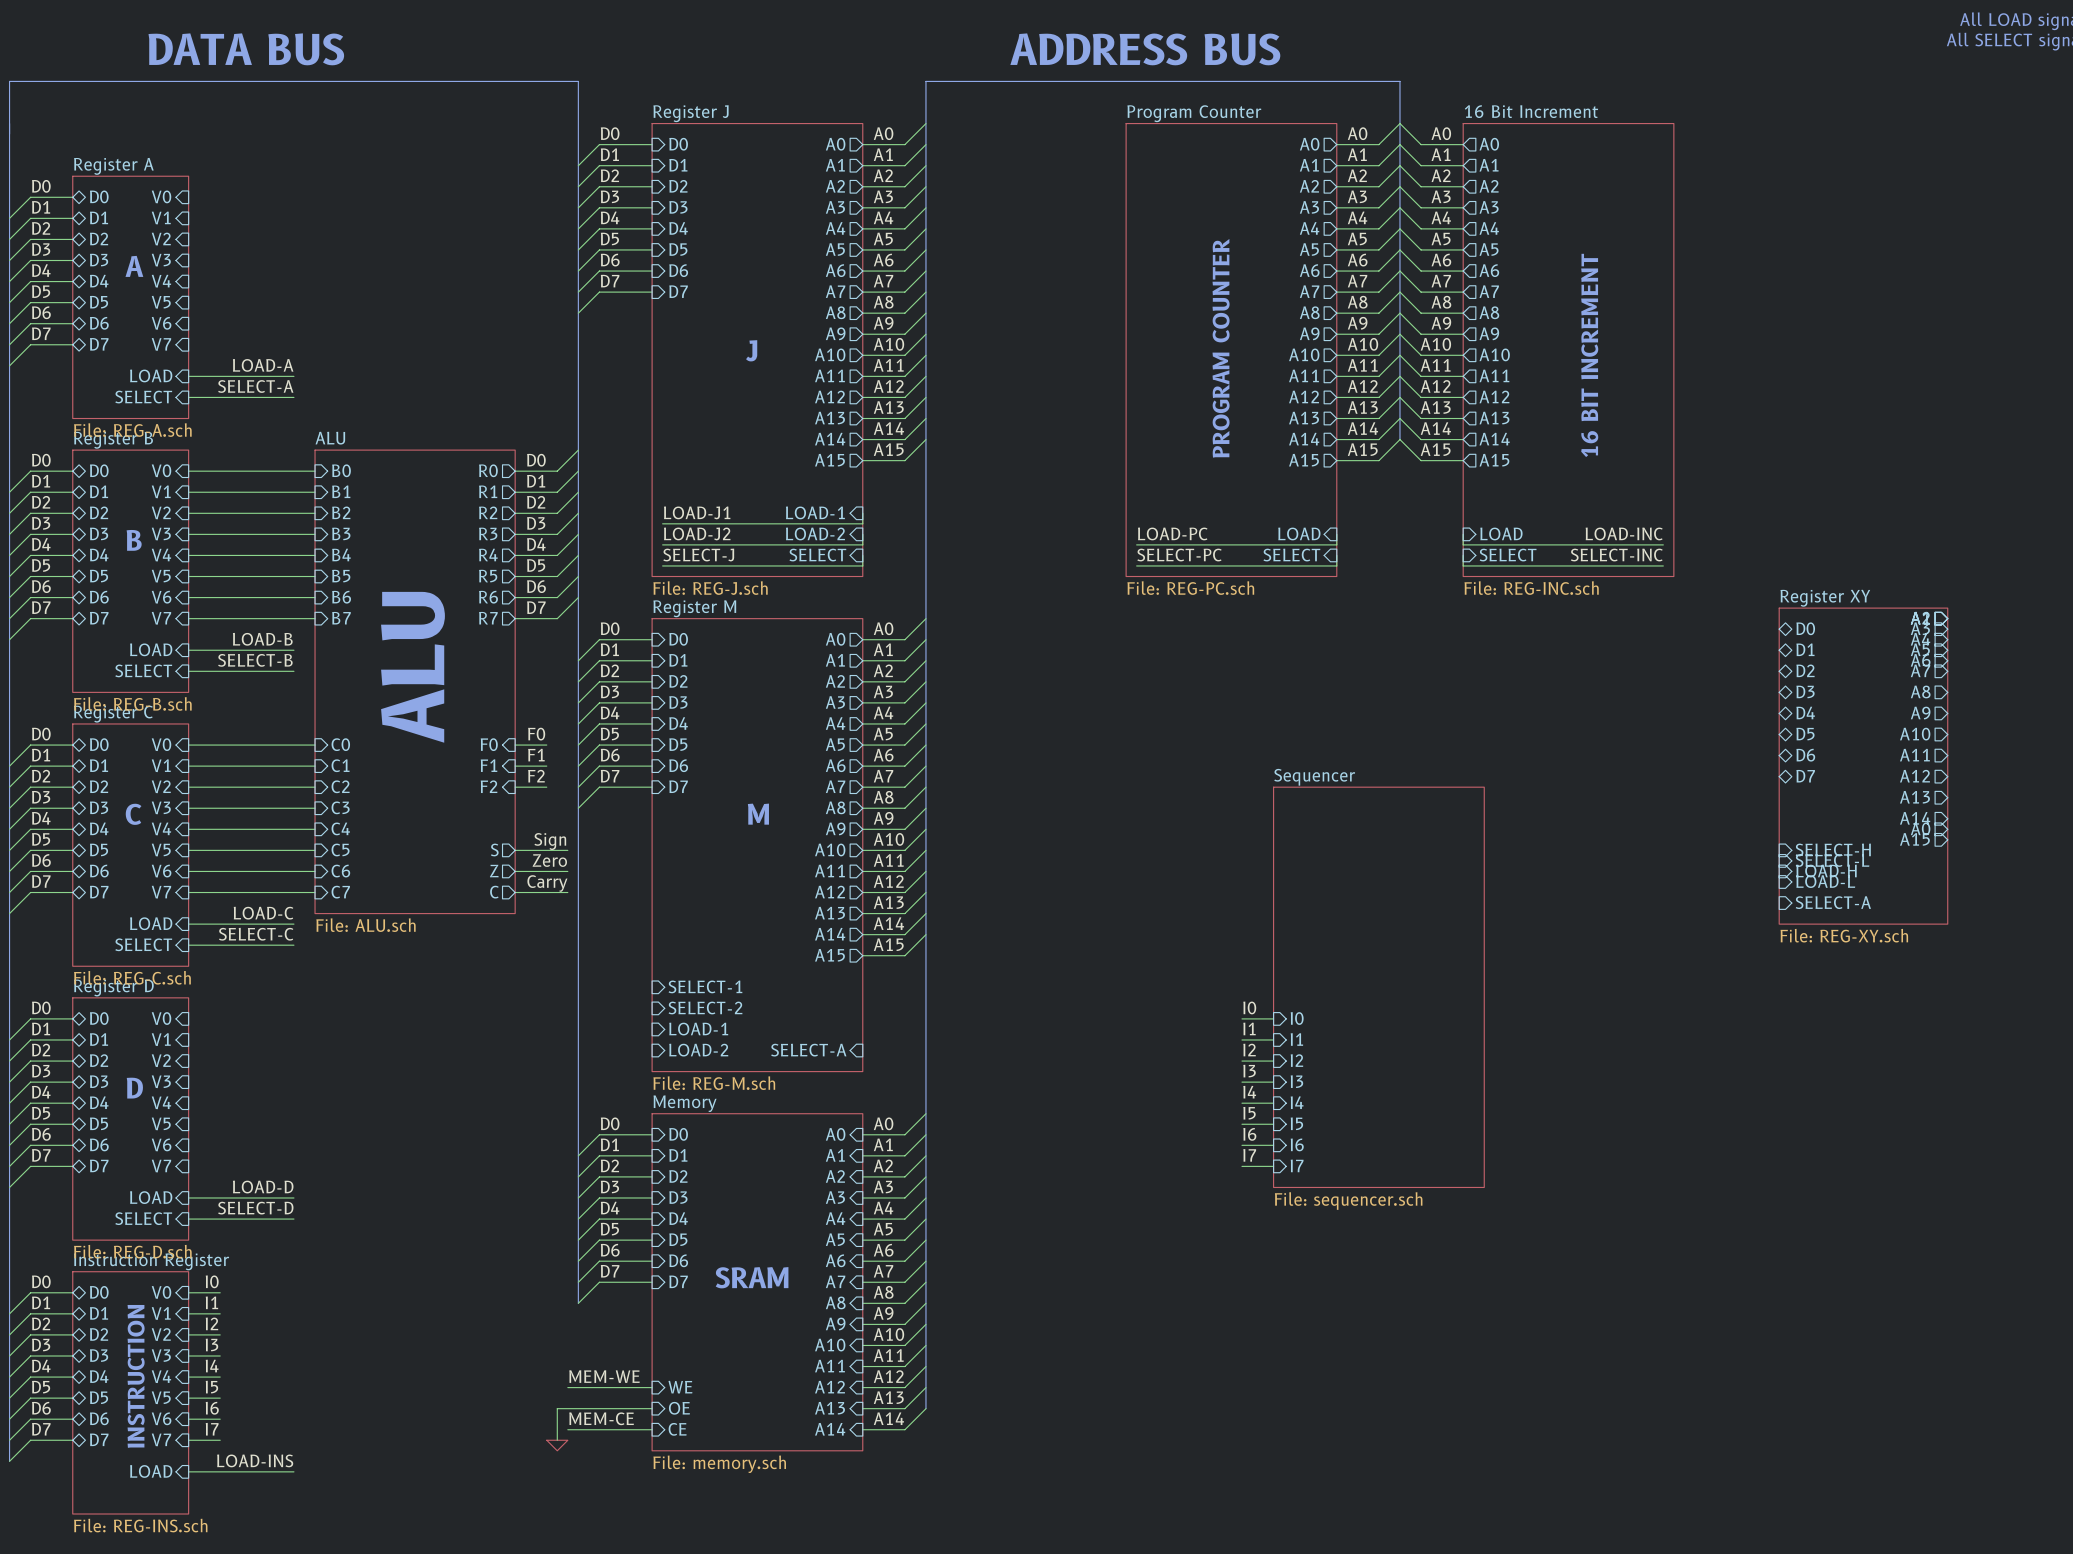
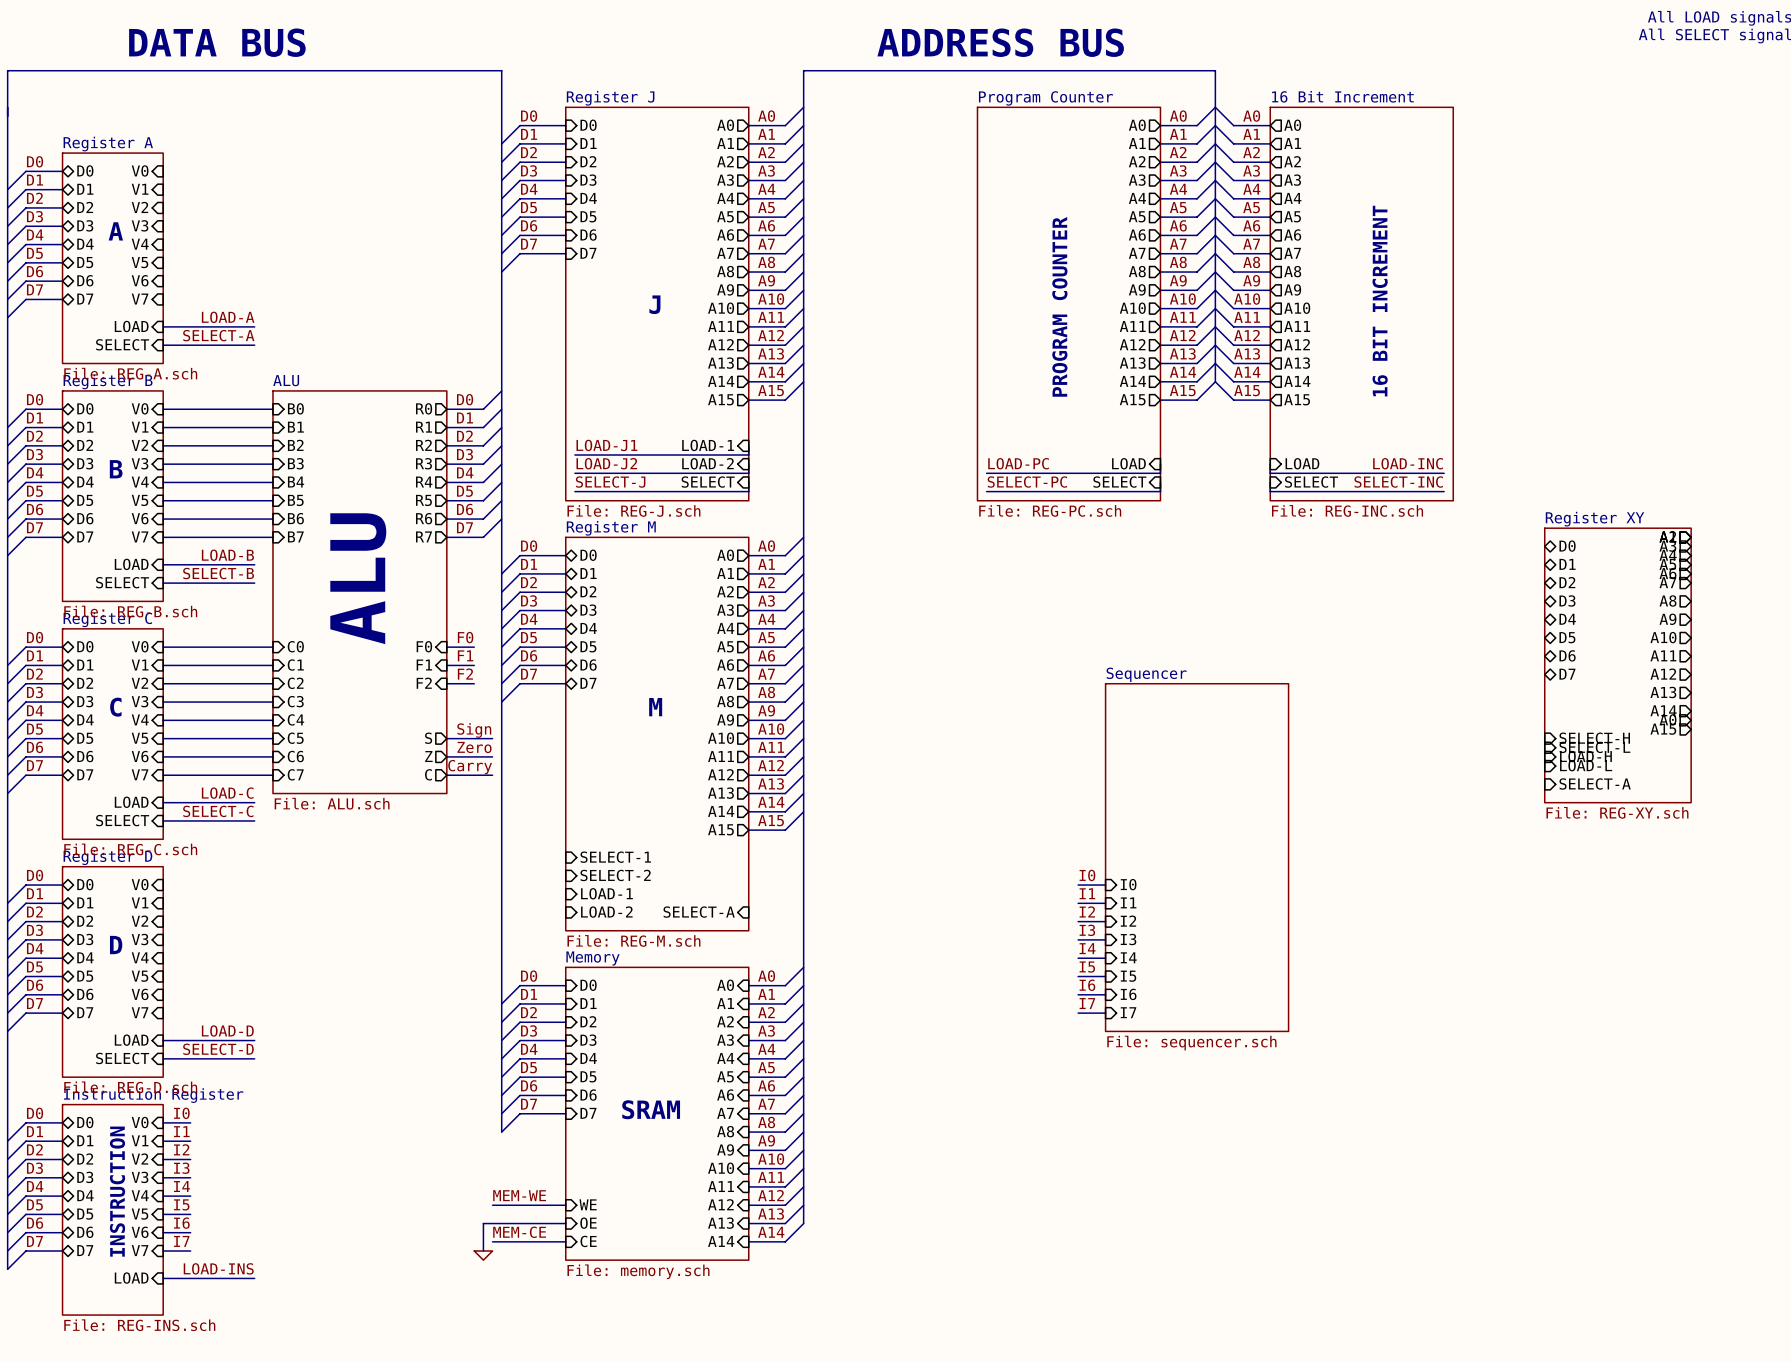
sheet pin shape: input (678, 639) -> bidirectional (588, 555)
sheet pin shape: input (678, 660) -> bidirectional (588, 573)
sheet pin shape: input (678, 681) -> bidirectional (588, 591)
sheet pin shape: input (678, 702) -> bidirectional (588, 610)
sheet pin shape: input (678, 723) -> bidirectional (588, 628)
sheet pin shape: input (678, 744) -> bidirectional (588, 646)
sheet pin shape: input (678, 765) -> bidirectional (588, 665)
sheet pin shape: input (678, 786) -> bidirectional (588, 683)

